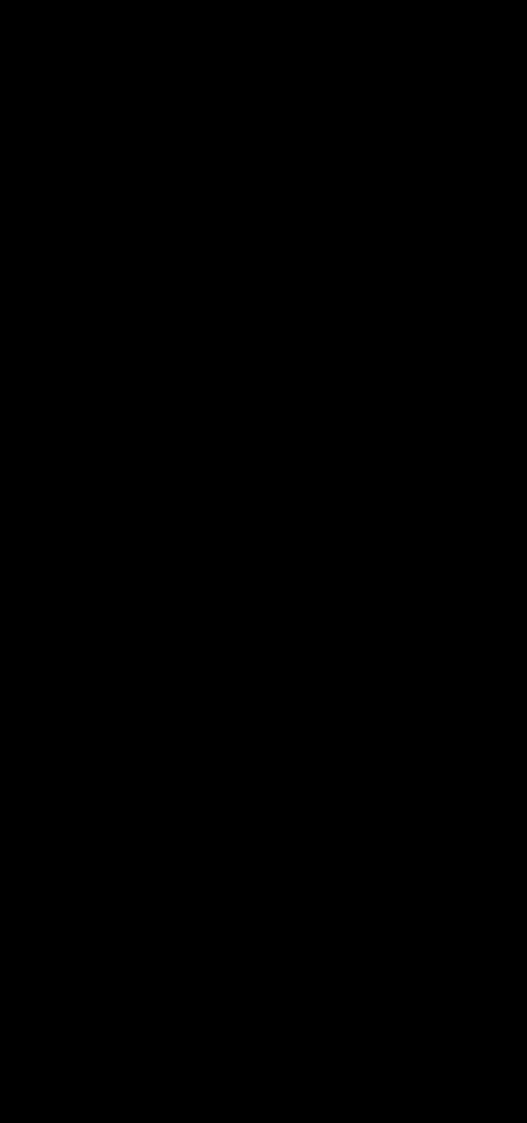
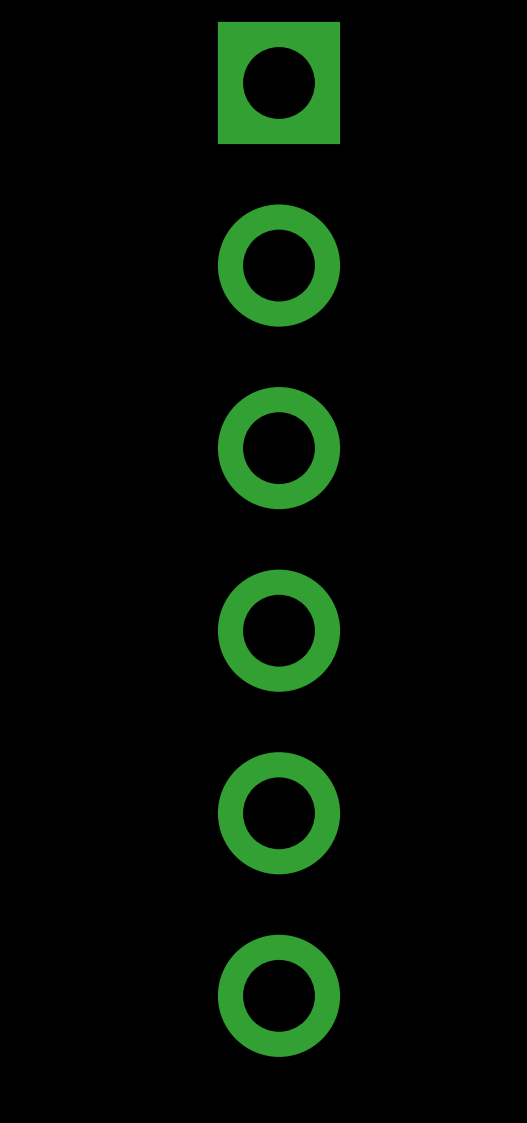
part: none -> (278, 539)

